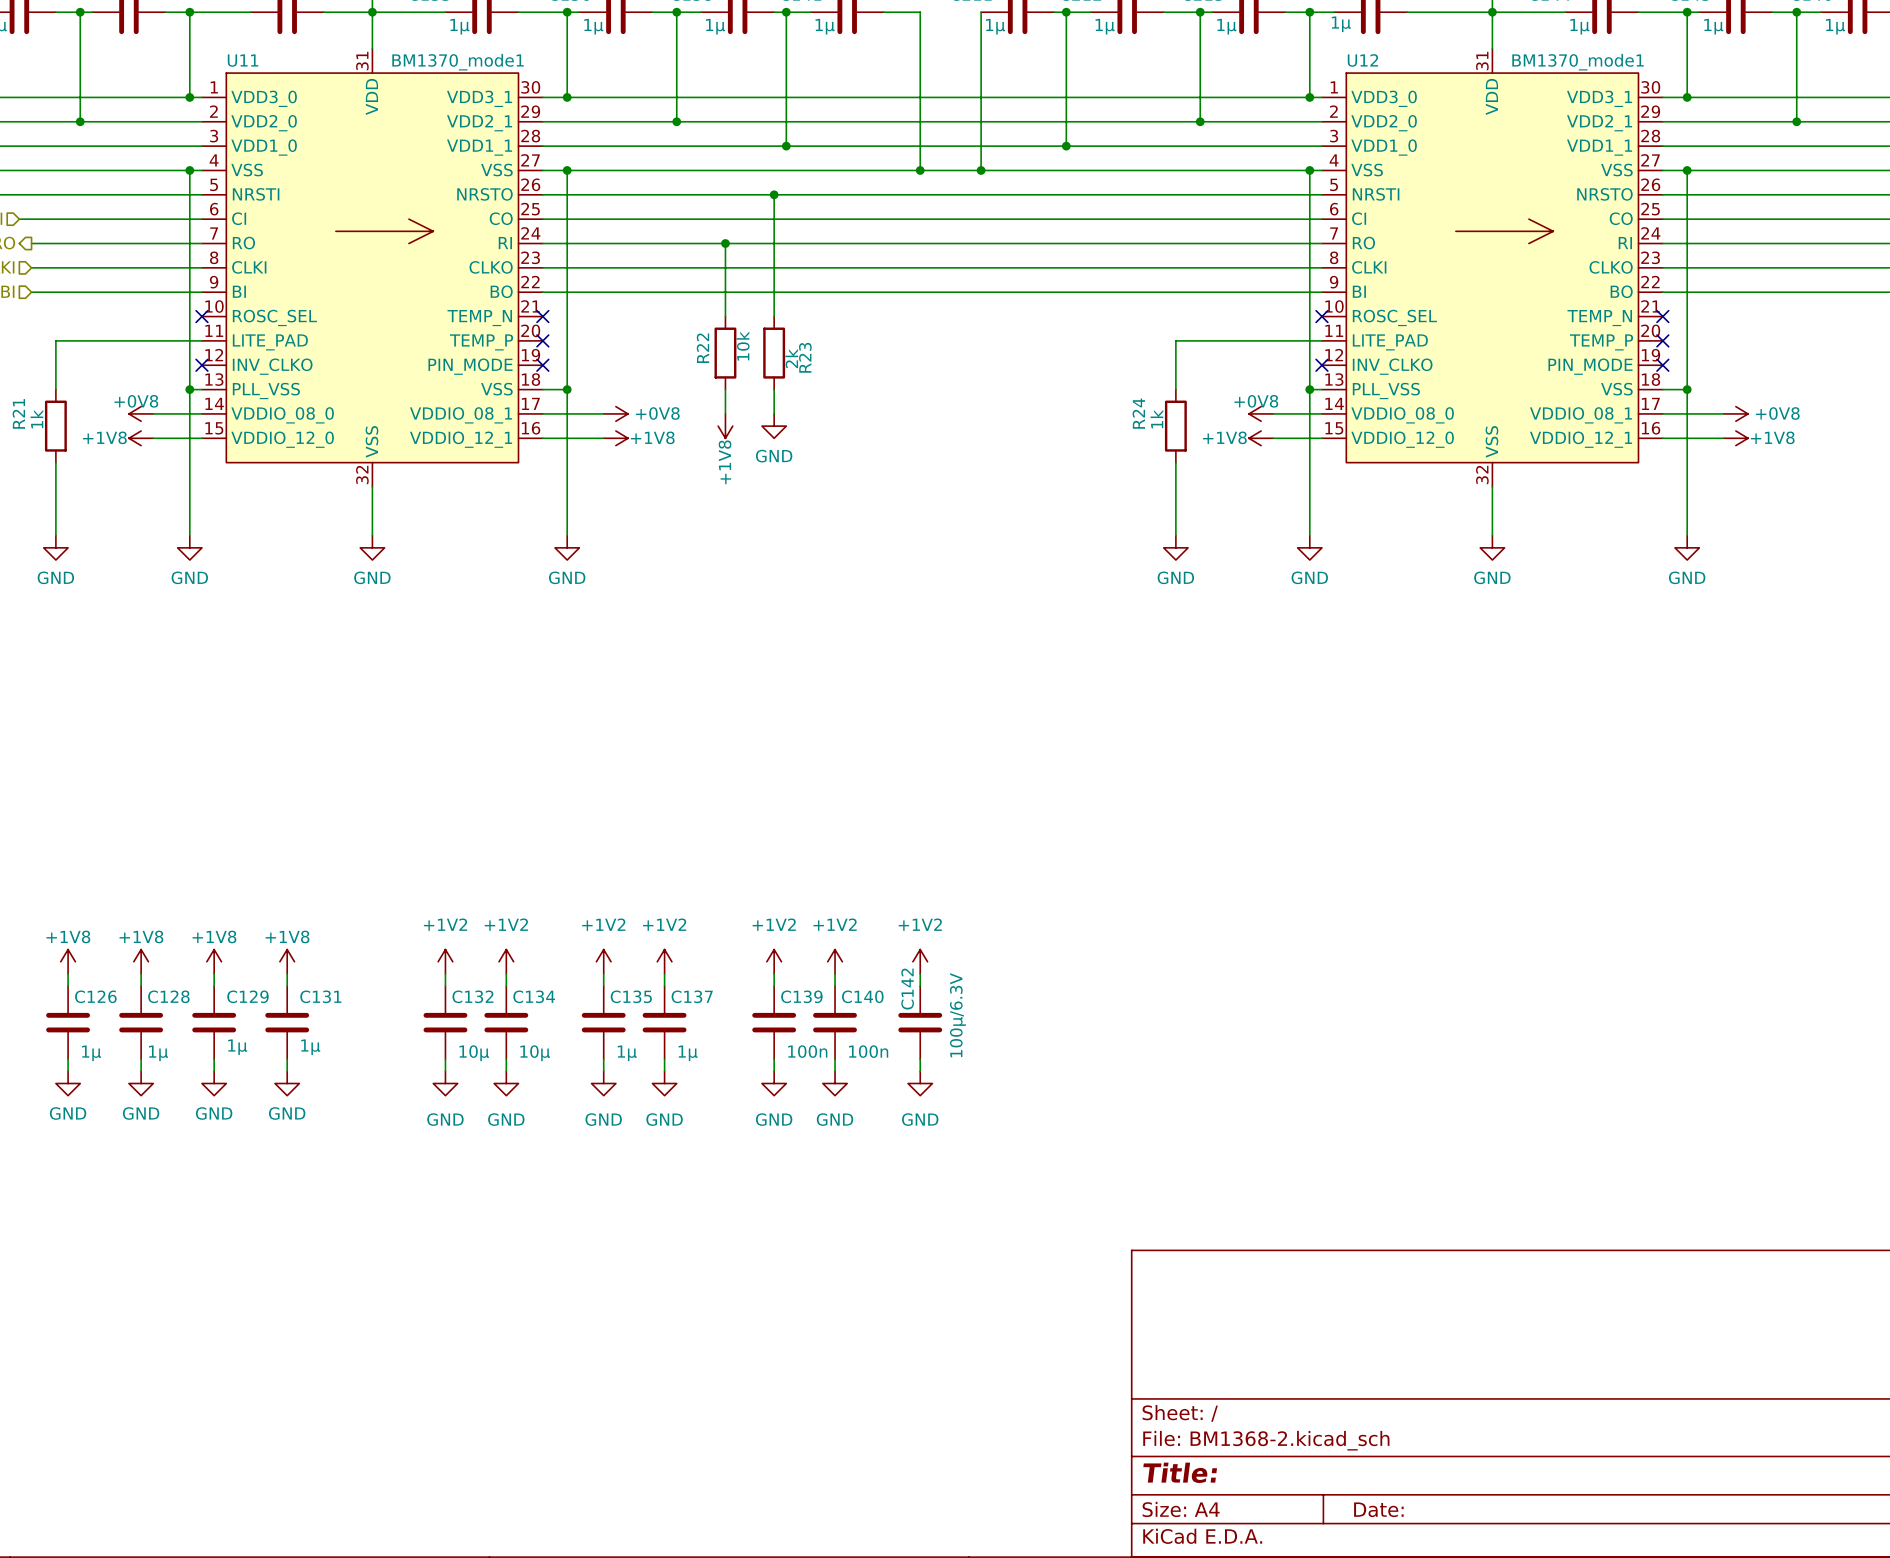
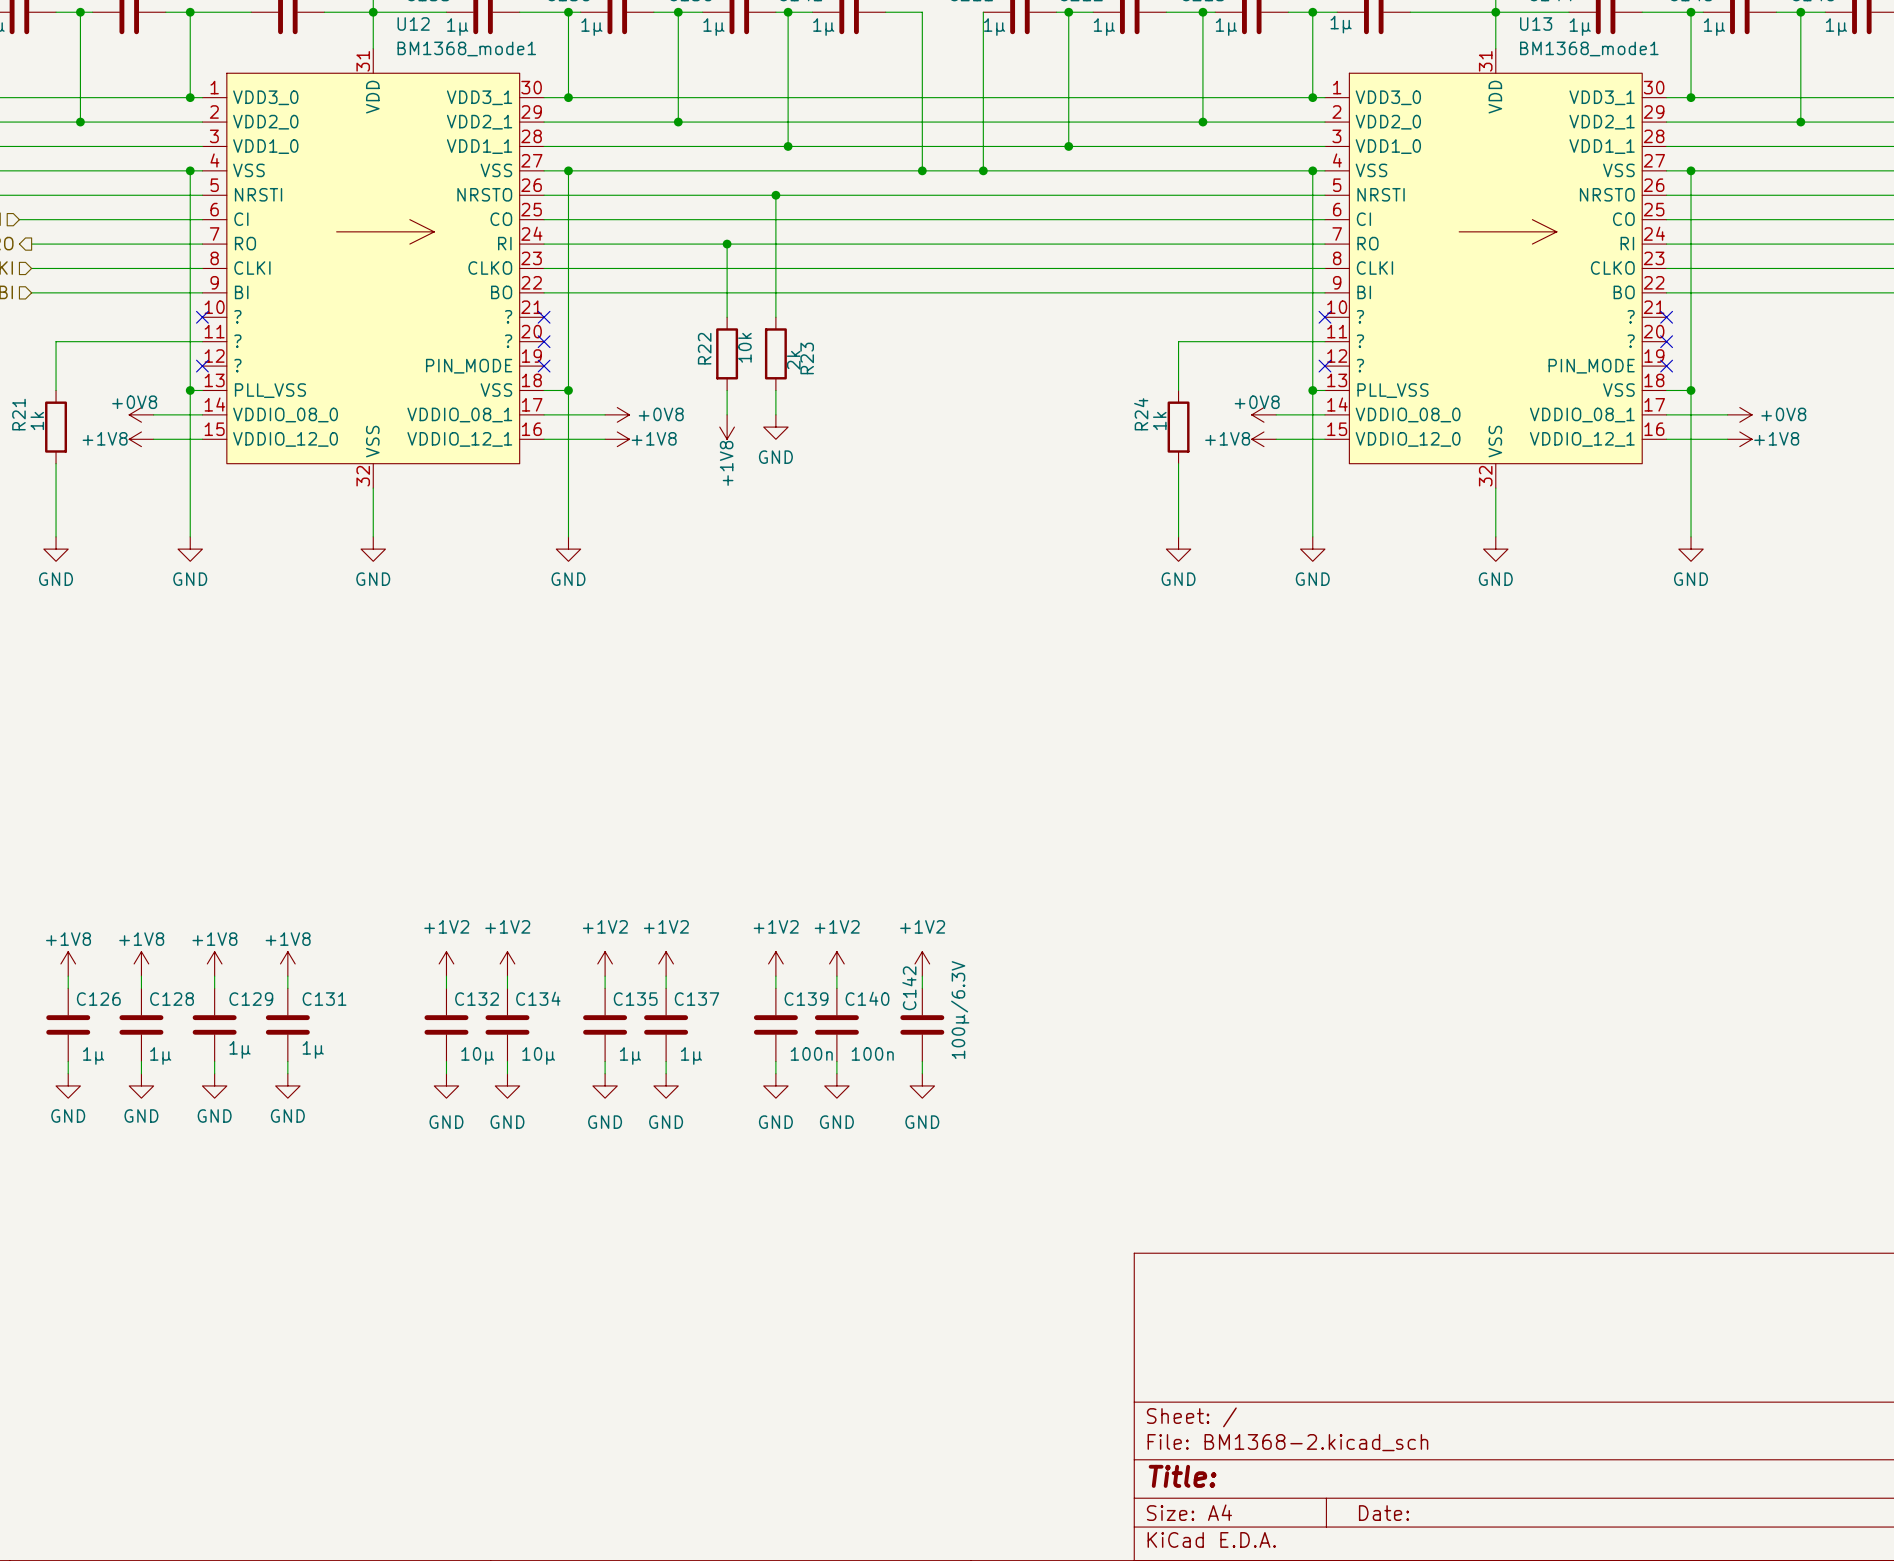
U12 name position: U12 (1362, 60) -> U12 (413, 23)
U12 value: BM1370_mode1 (1578, 62) -> BM1368_mode1 (466, 48)
U11: BM1370_mode1 (372, 267) -> none
U12 position: (1492, 267) -> (373, 268)
U13: none -> BM1368_mode1 (1495, 268)
U12 pin name: ROSC_SEL (1394, 317) -> ? (237, 316)
U12 pin name: TEMP_N (1599, 318) -> ? (508, 316)
U12 pin name: LITE_PAD (1390, 342) -> ? (237, 341)
U12 pin name: TEMP_P (1601, 342) -> ? (508, 341)
U12 pin name: INV_CLKO (1392, 366) -> ? (237, 365)

